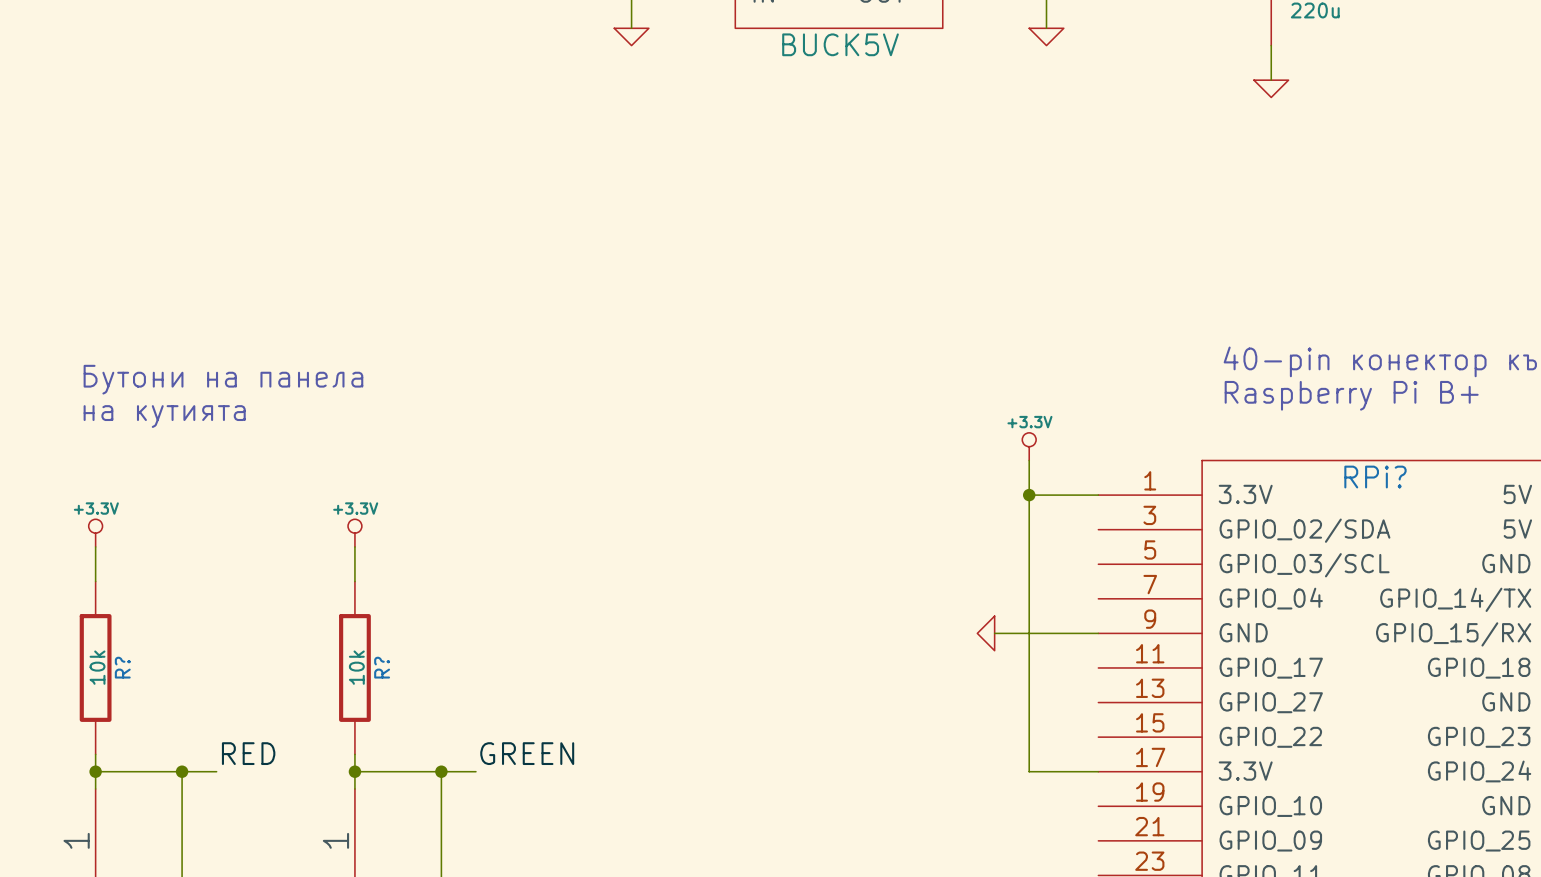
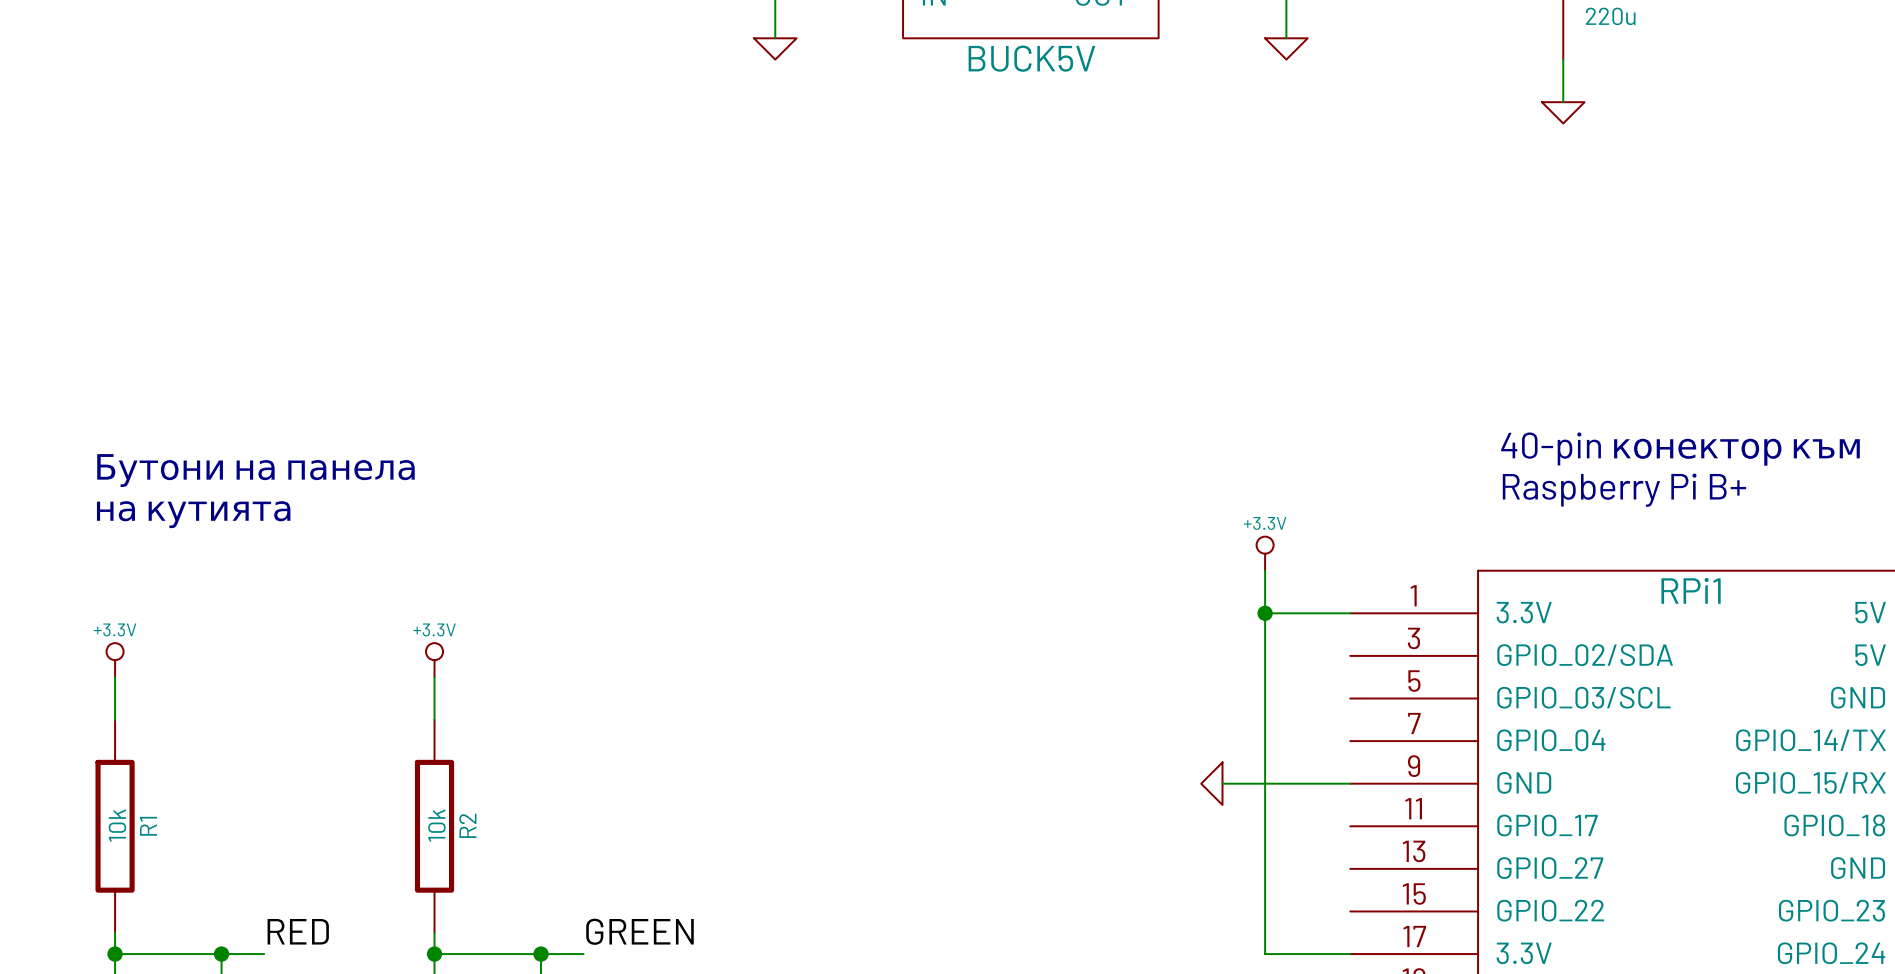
RPi? name: RPi? (1375, 477) -> RPi1 (1691, 590)
R? name: R? (122, 667) -> R1 (148, 826)
R? name: R? (382, 667) -> R2 (467, 825)

